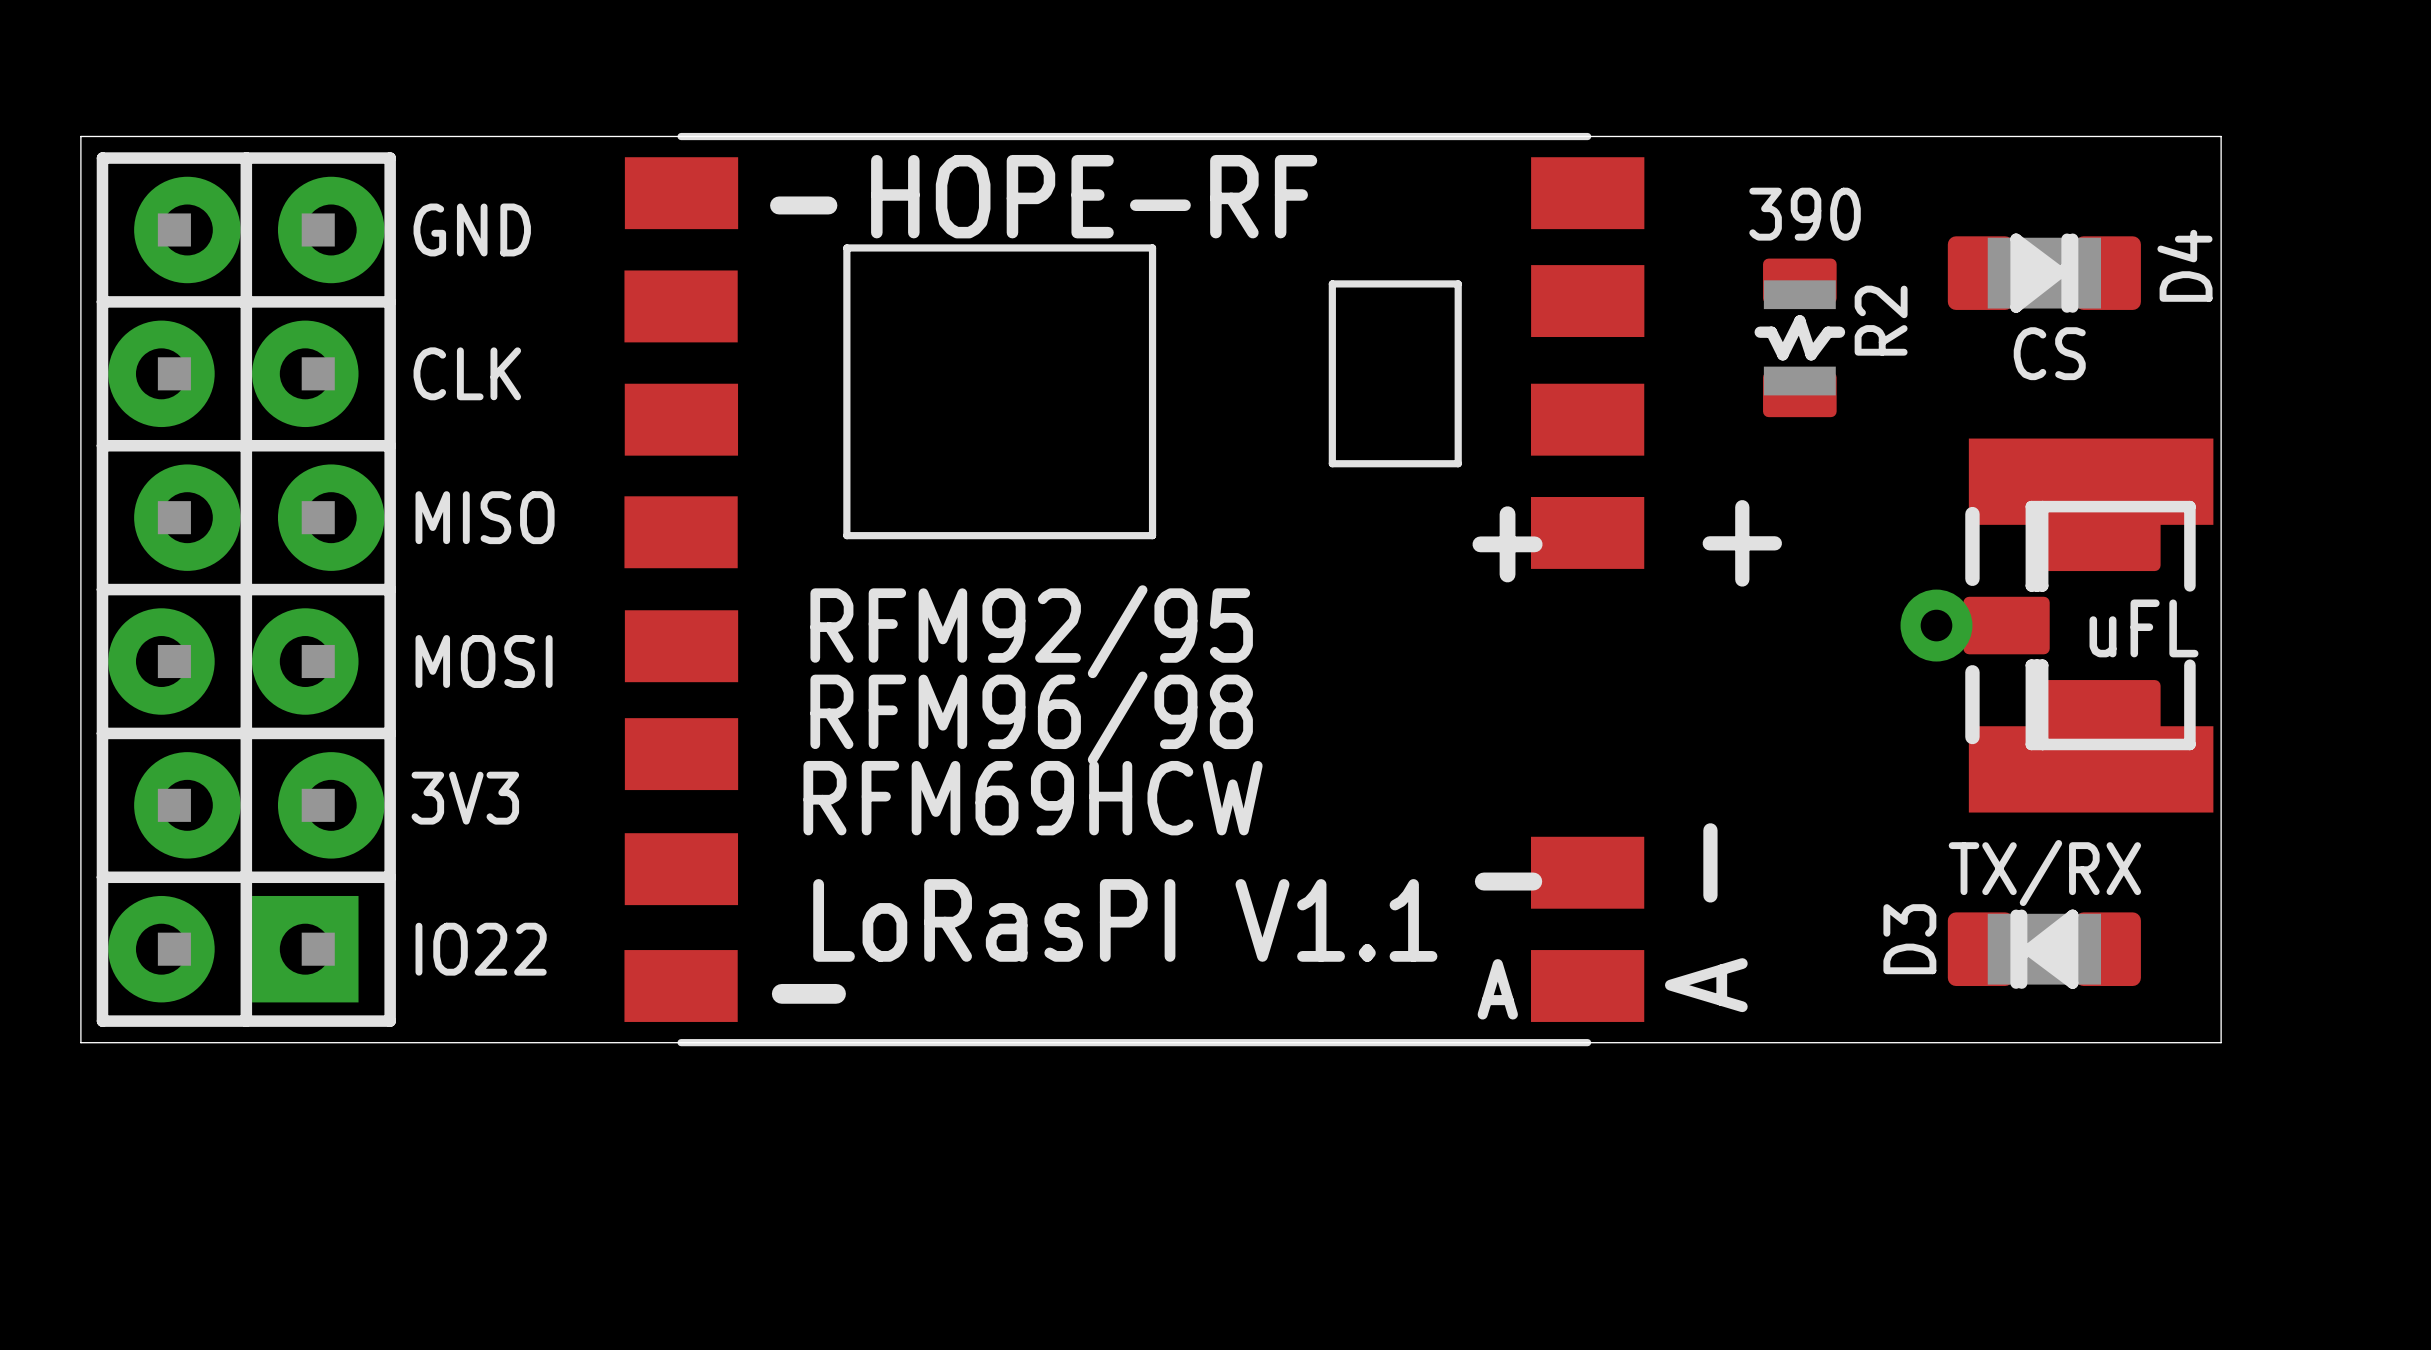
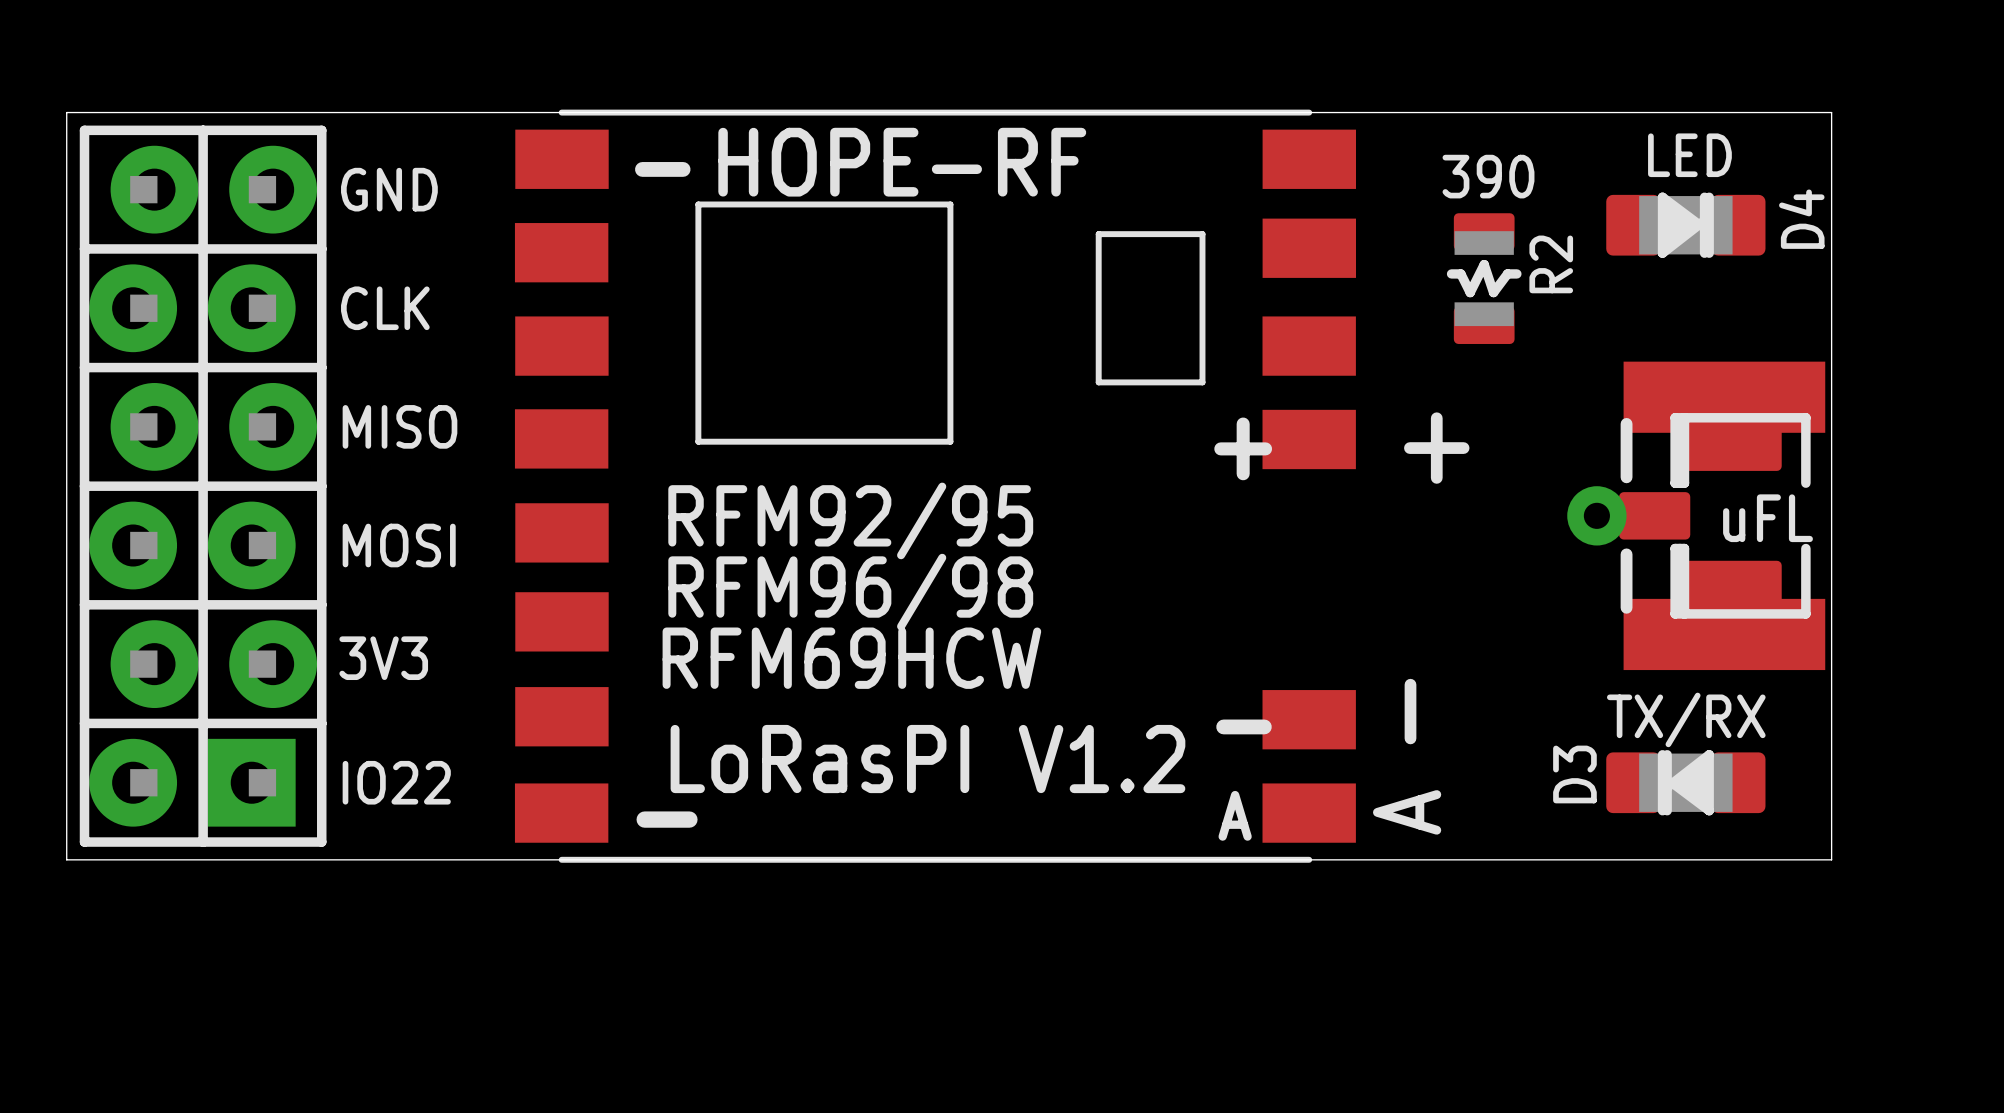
D4 value: CS (2049, 353) -> LED (1689, 155)
text: LoRasPI V1.1 (1125, 920) -> LoRasPI V1.2 (927, 759)

